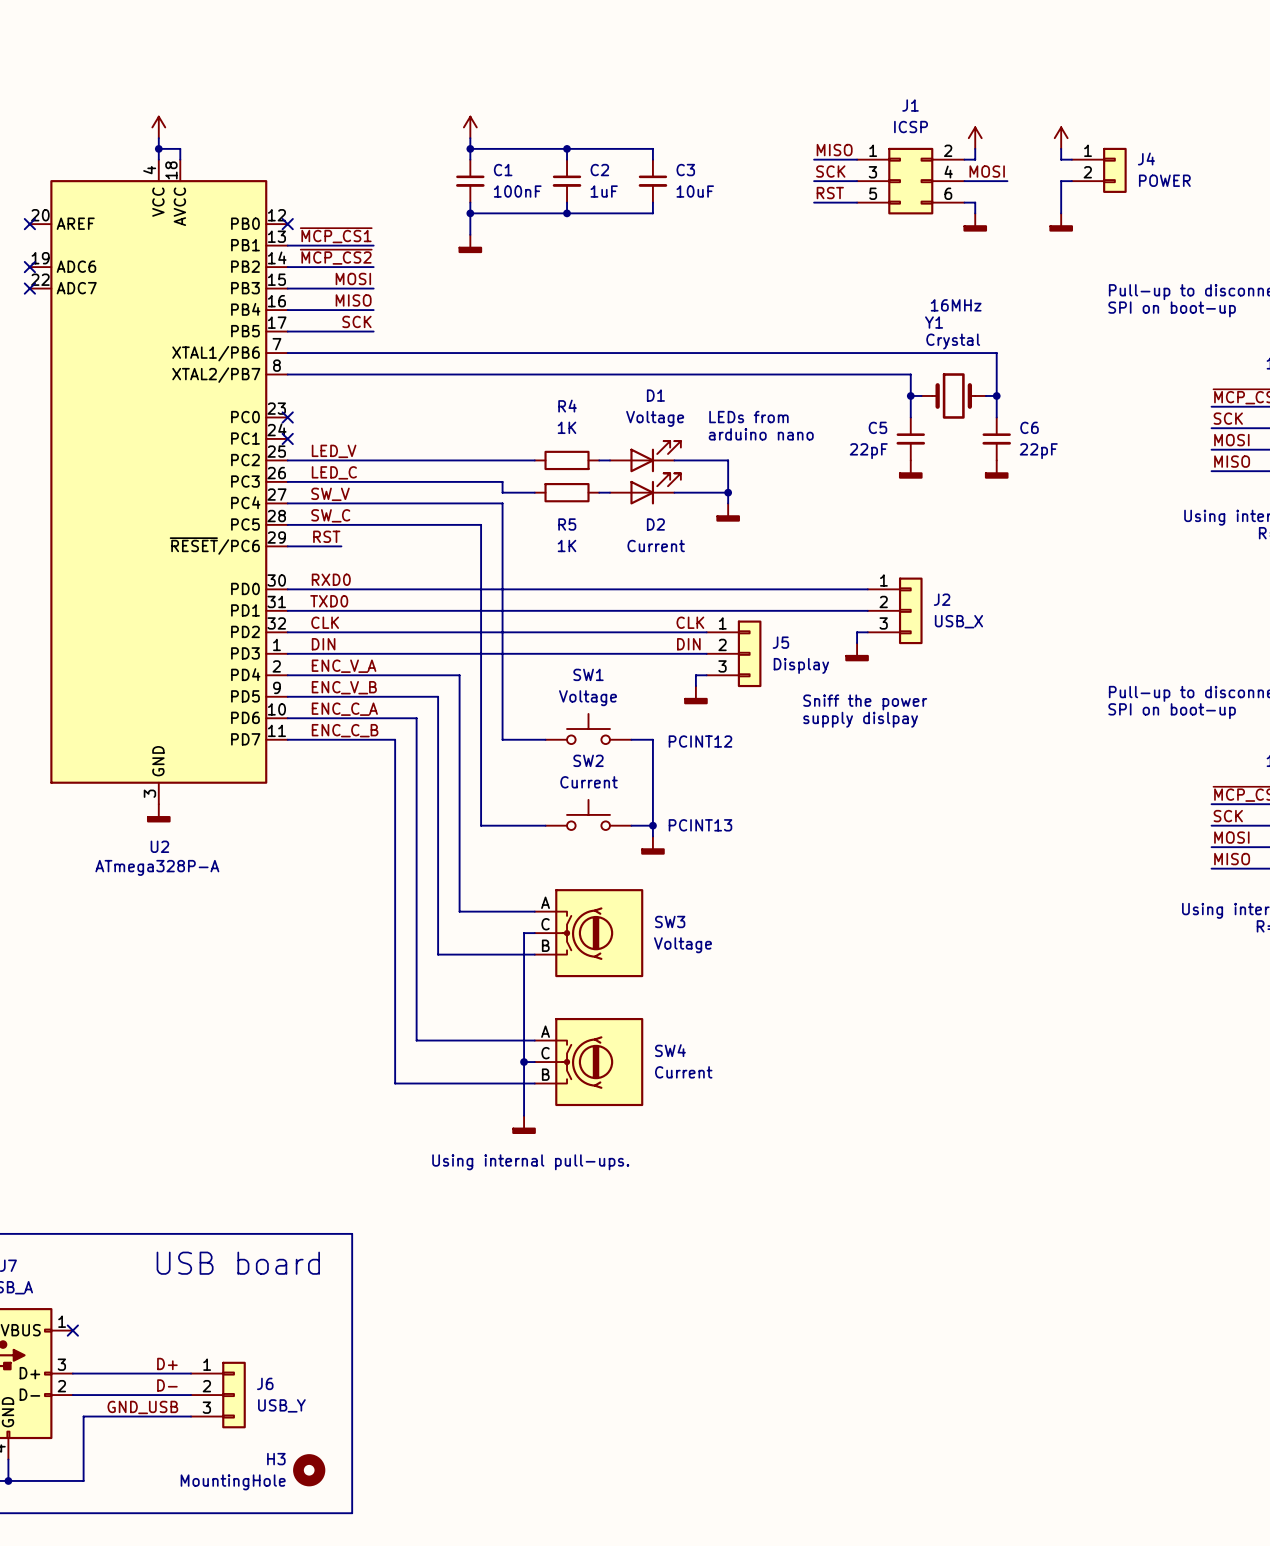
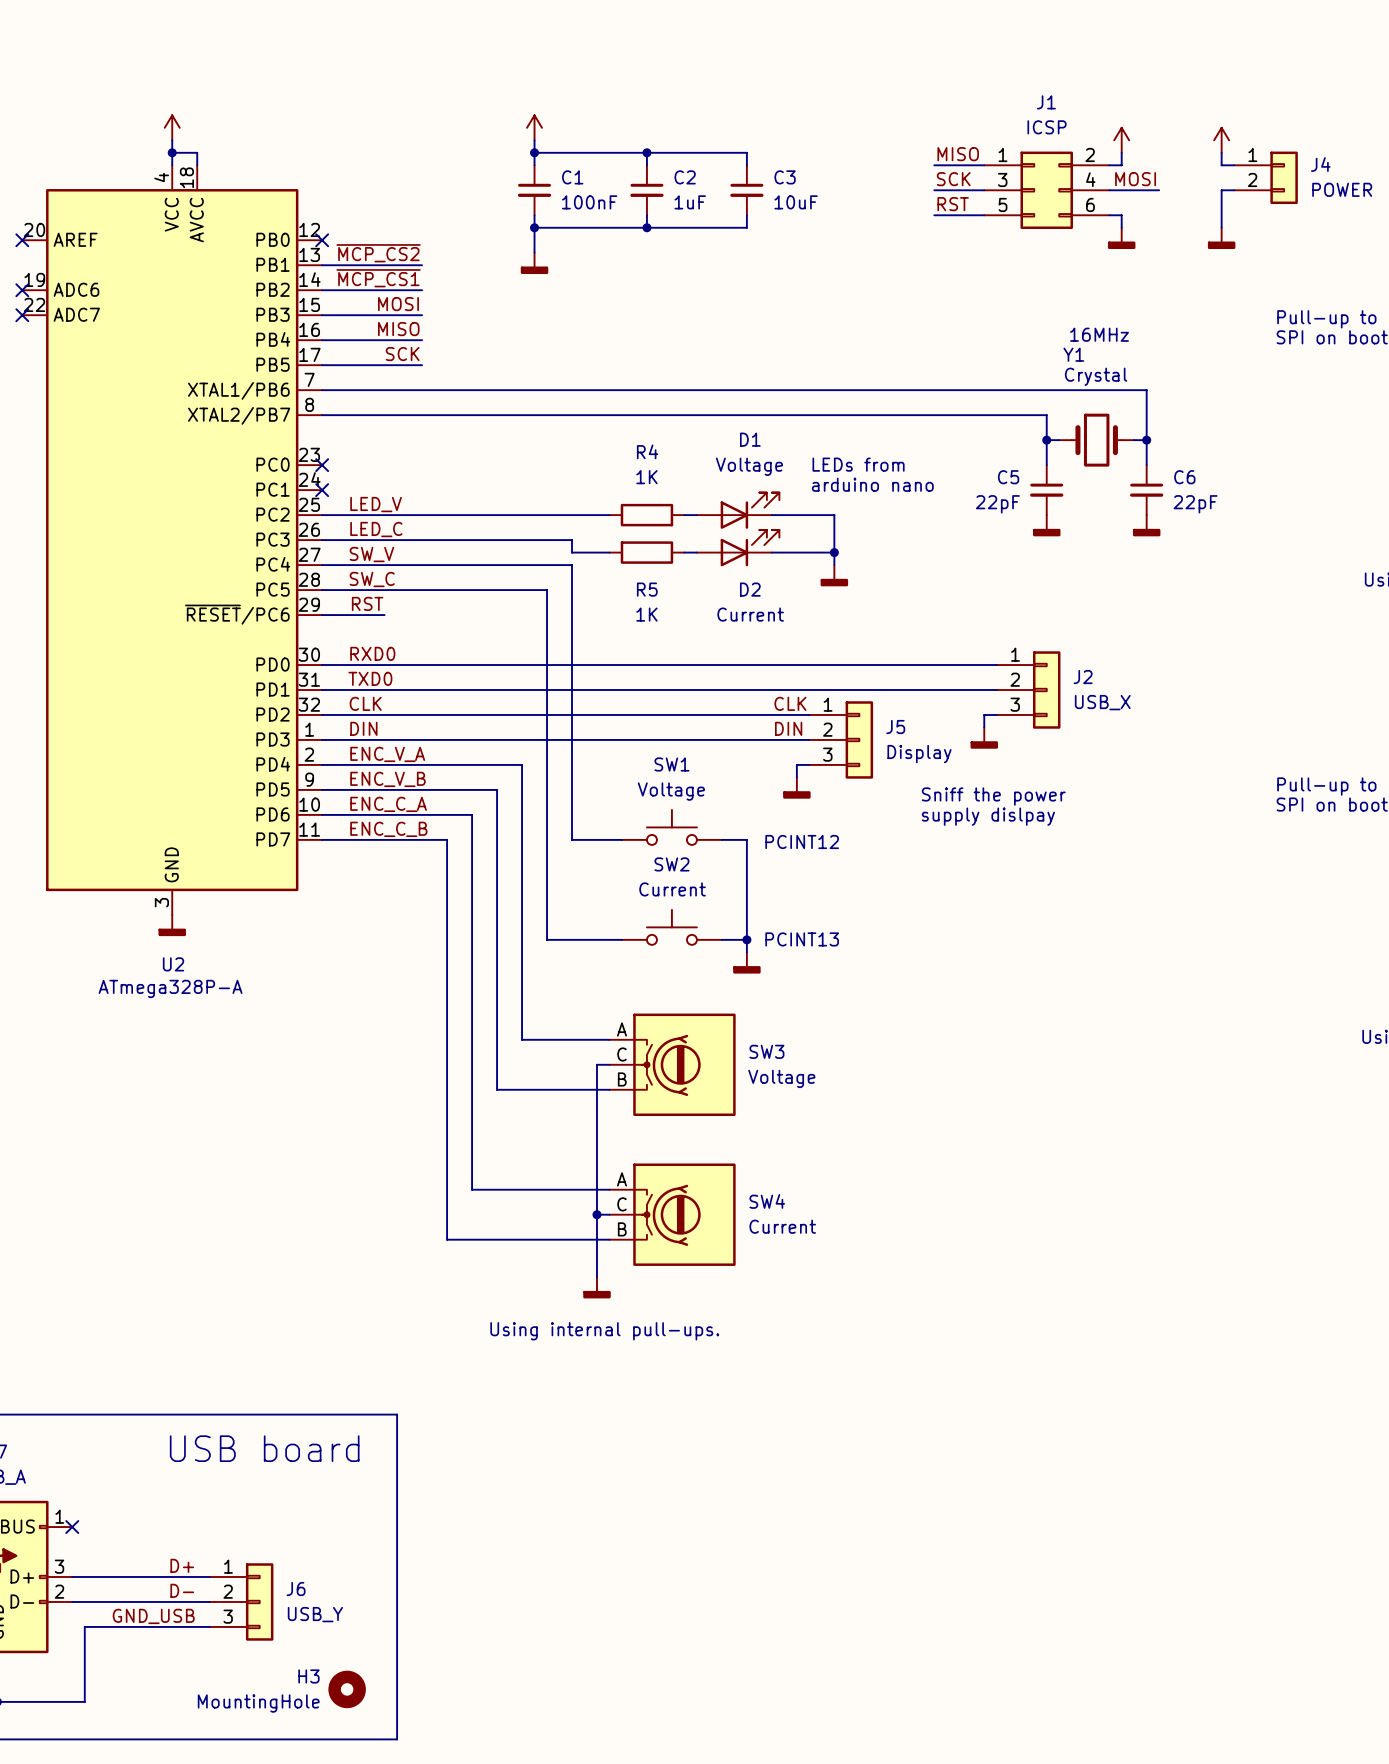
label: ~{MCP_CS1} (336, 235) -> ~{MCP_CS2} (378, 253)
label: ~{MCP_CS2} (336, 256) -> ~{MCP_CS1} (378, 278)

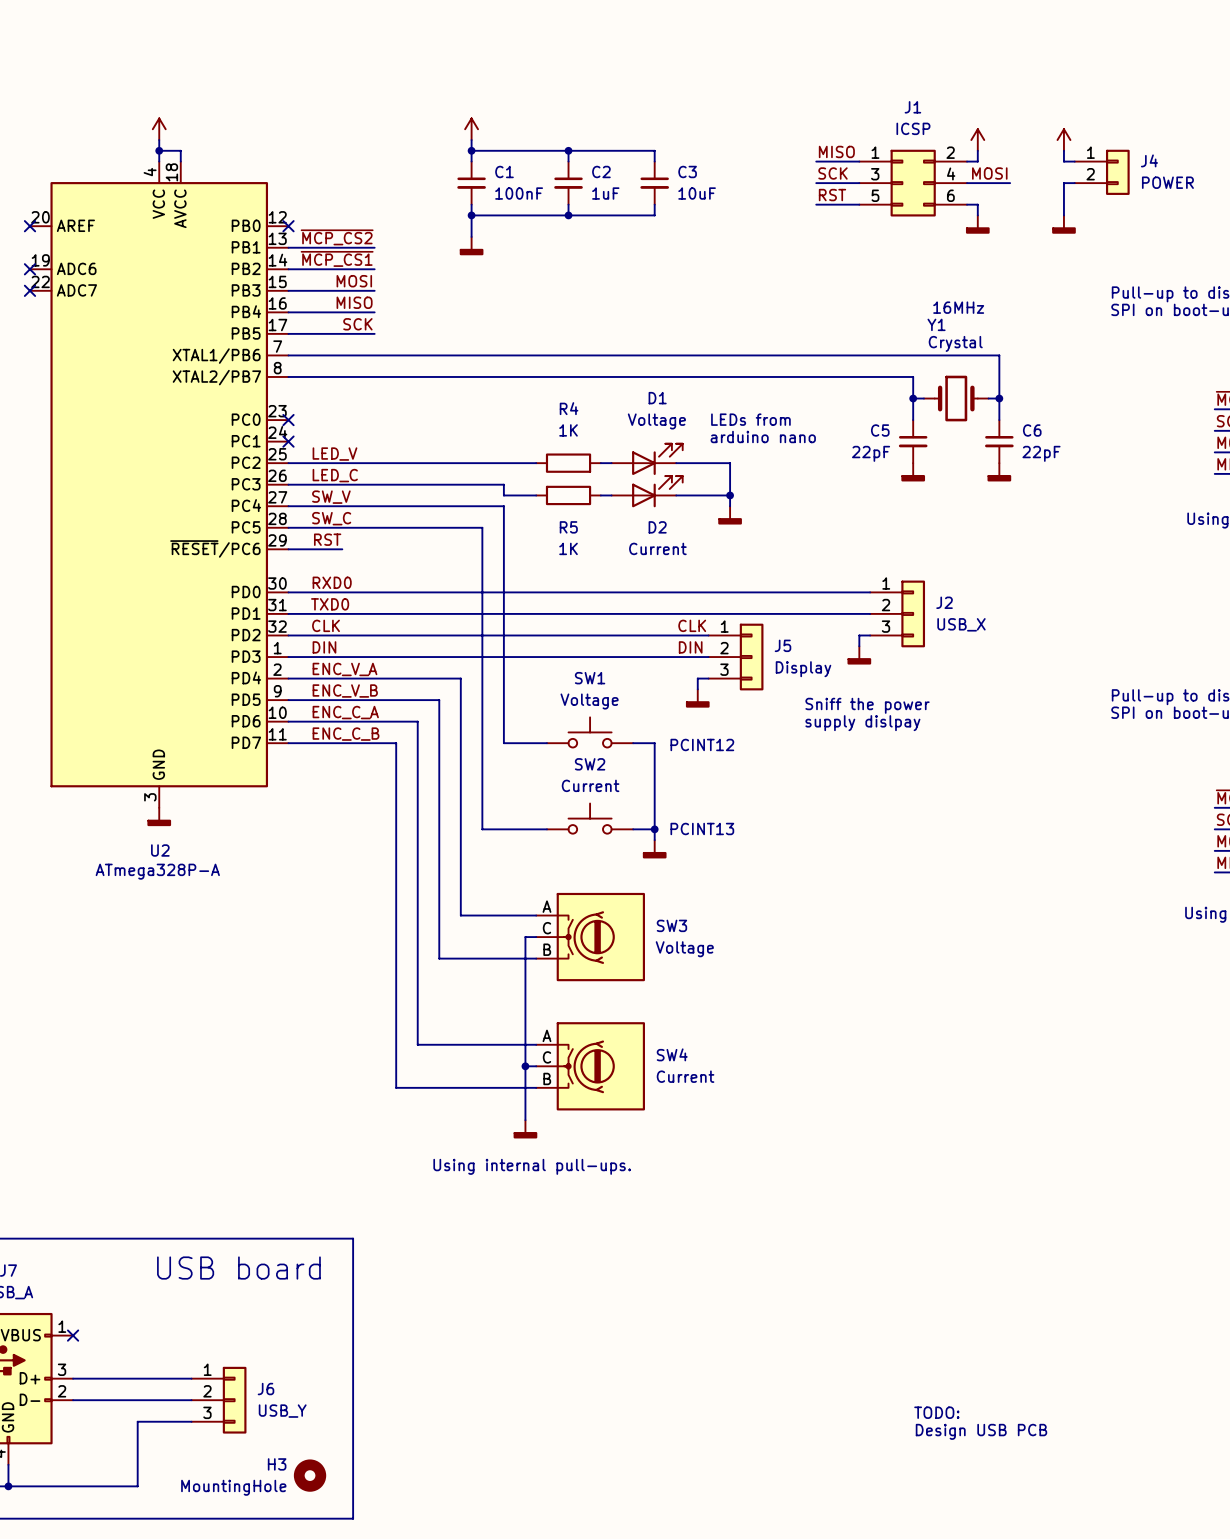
label: D+ (182, 1565) -> none
label: D- (182, 1590) -> none
label: GND_USB (153, 1616) -> none
text: none -> TODO: (936, 1412)
wire: (147, 1626) (84, 1626) (84, 1701) -> (137, 1421) (137, 1486) (83, 1486)
text: none -> Design USB PCB (981, 1431)

